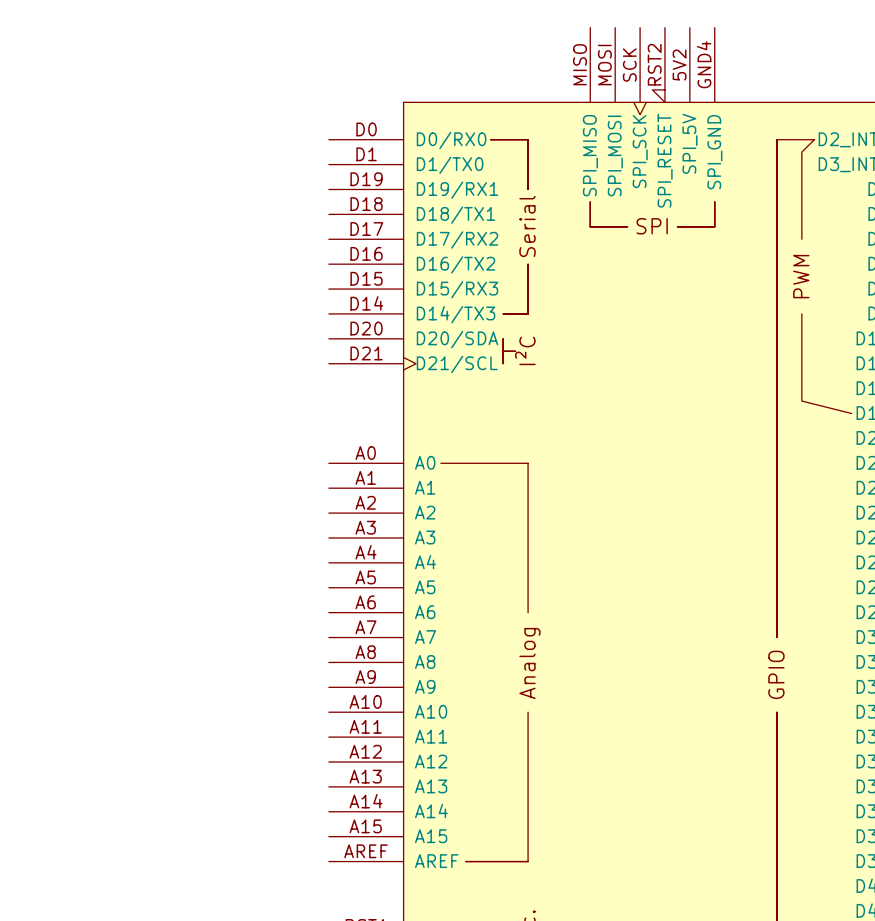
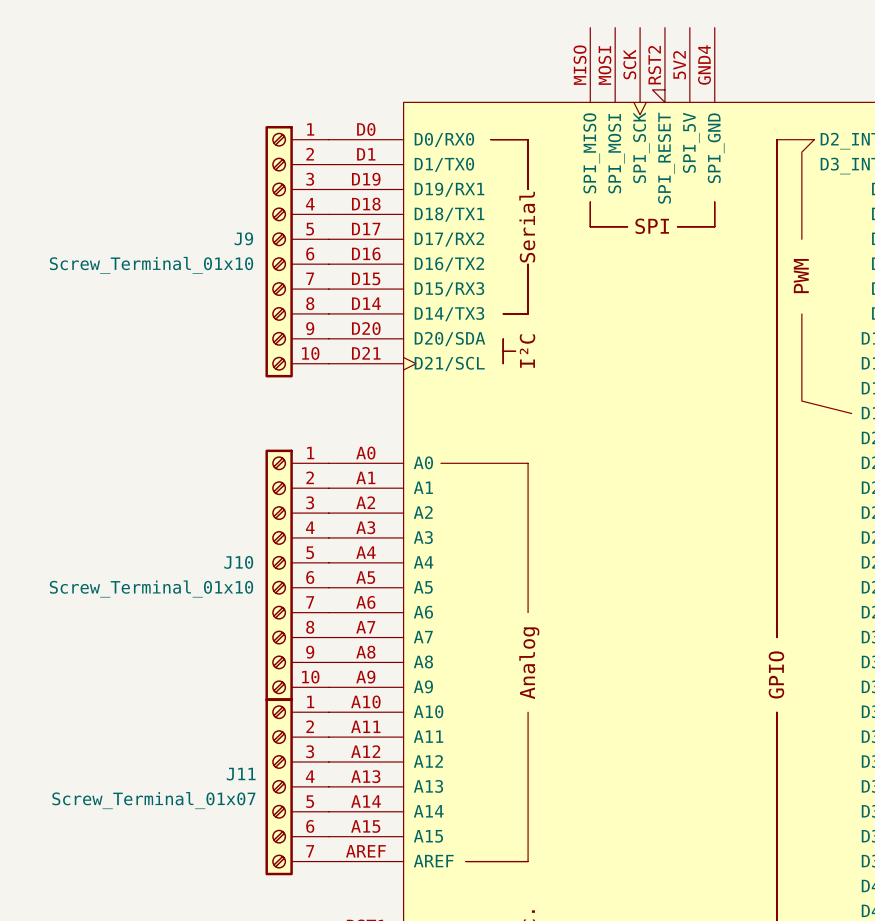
J9: none -> Screw_Terminal_01x10 (297, 251)
J10: none -> Screw_Terminal_01x10 (297, 575)
J11: none -> Screw_Terminal_01x07 (297, 786)

